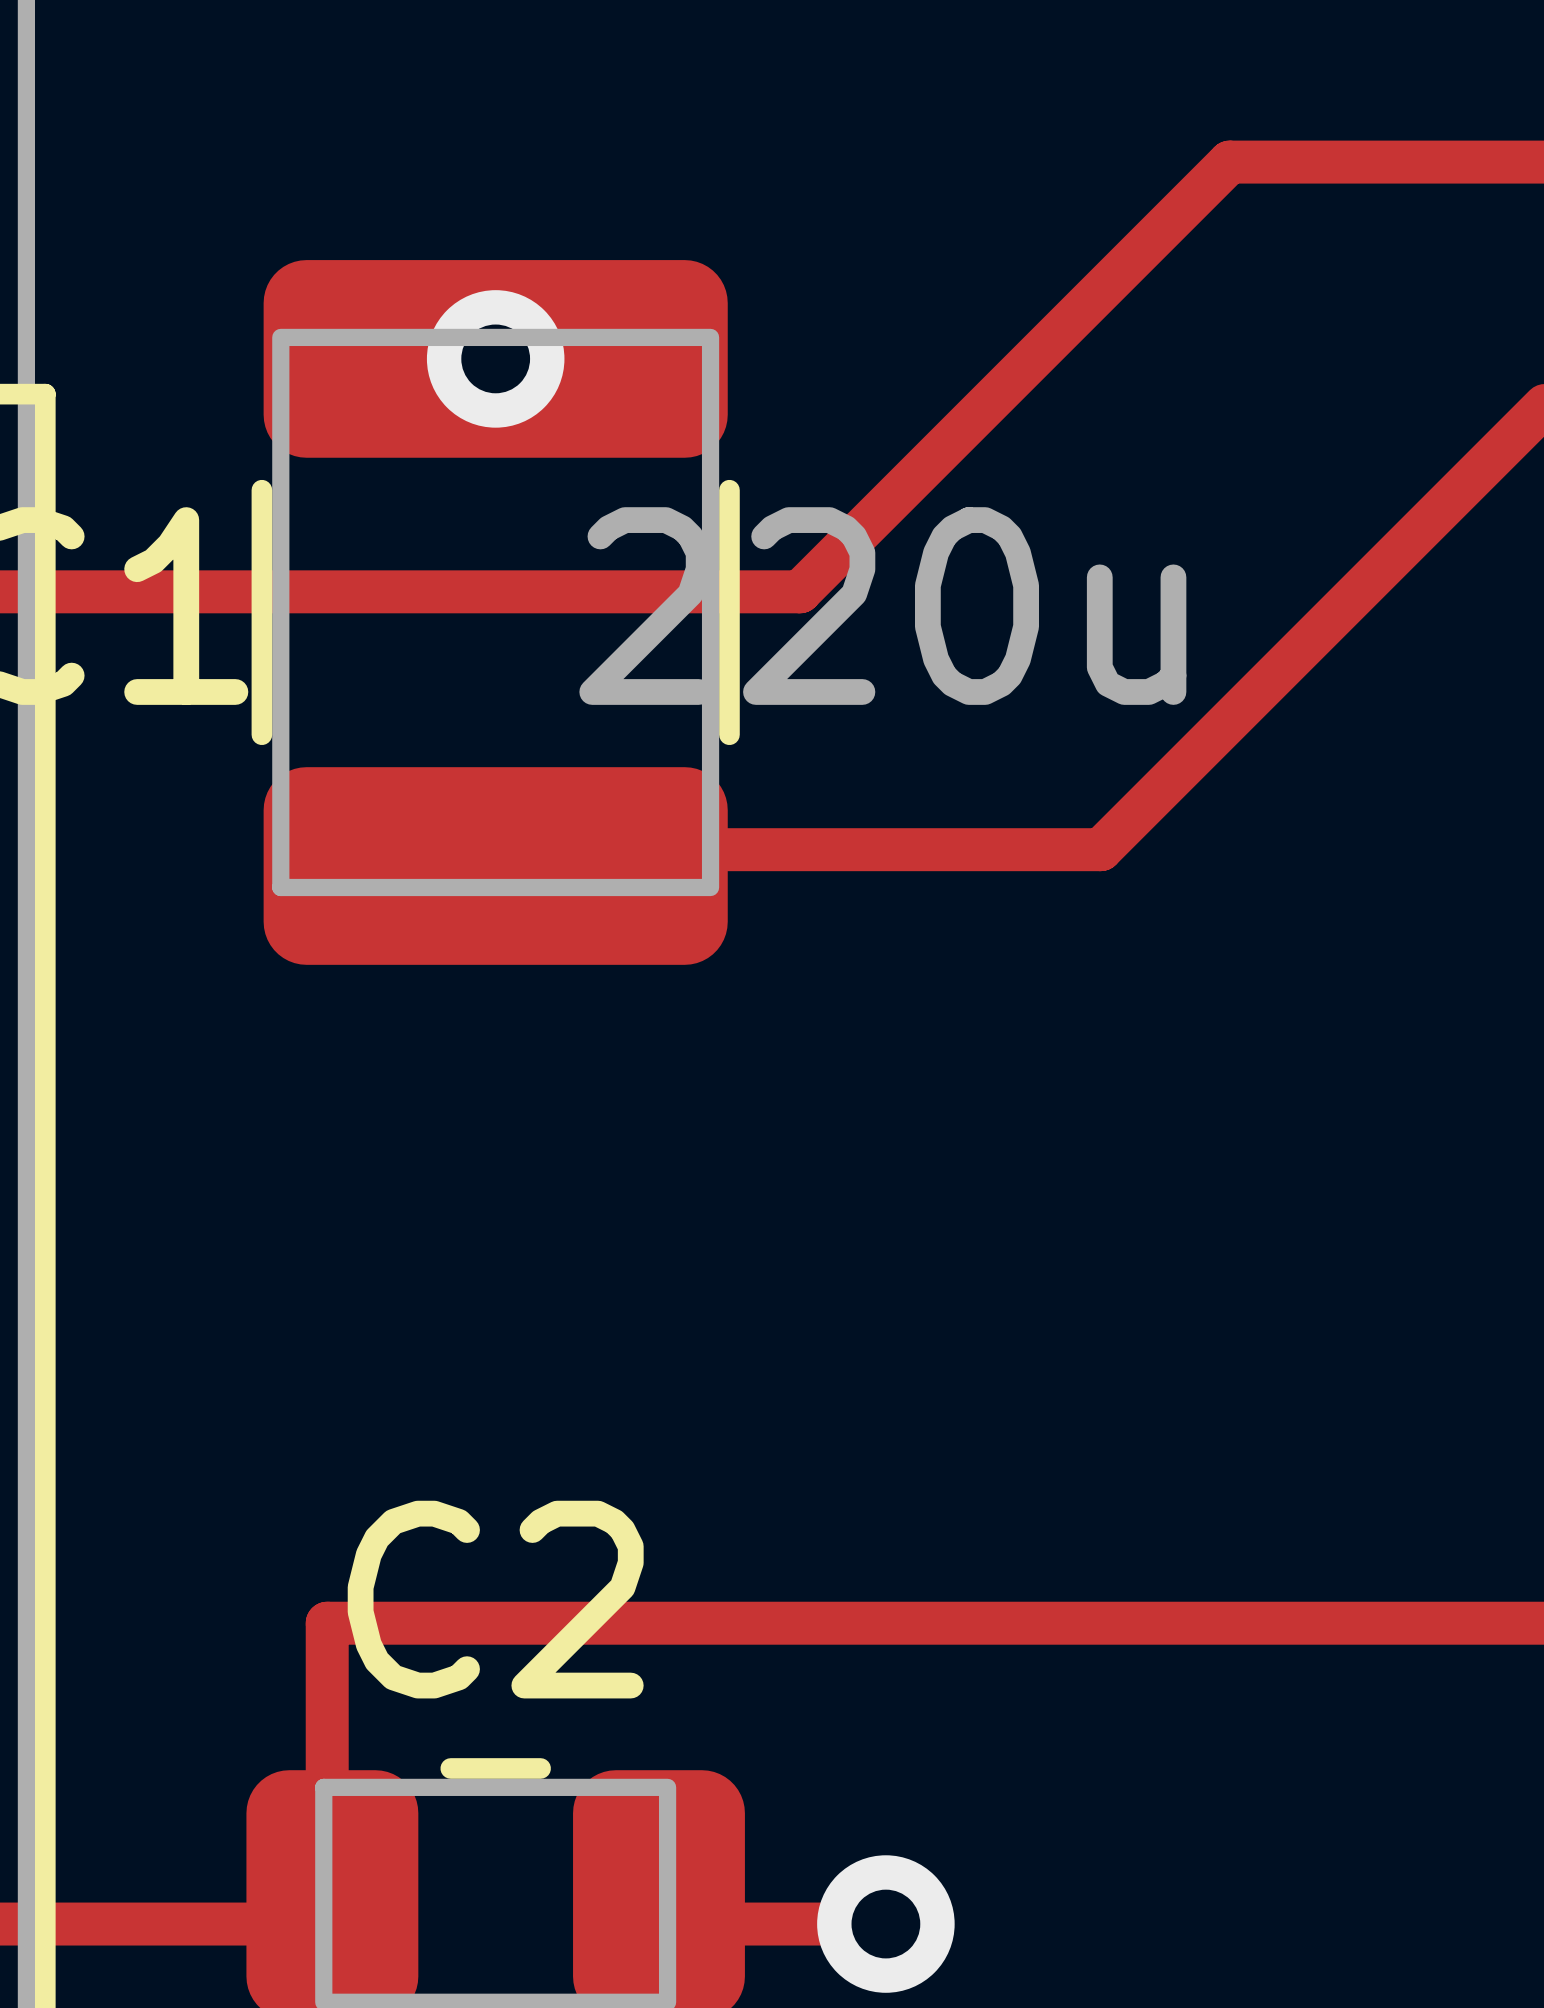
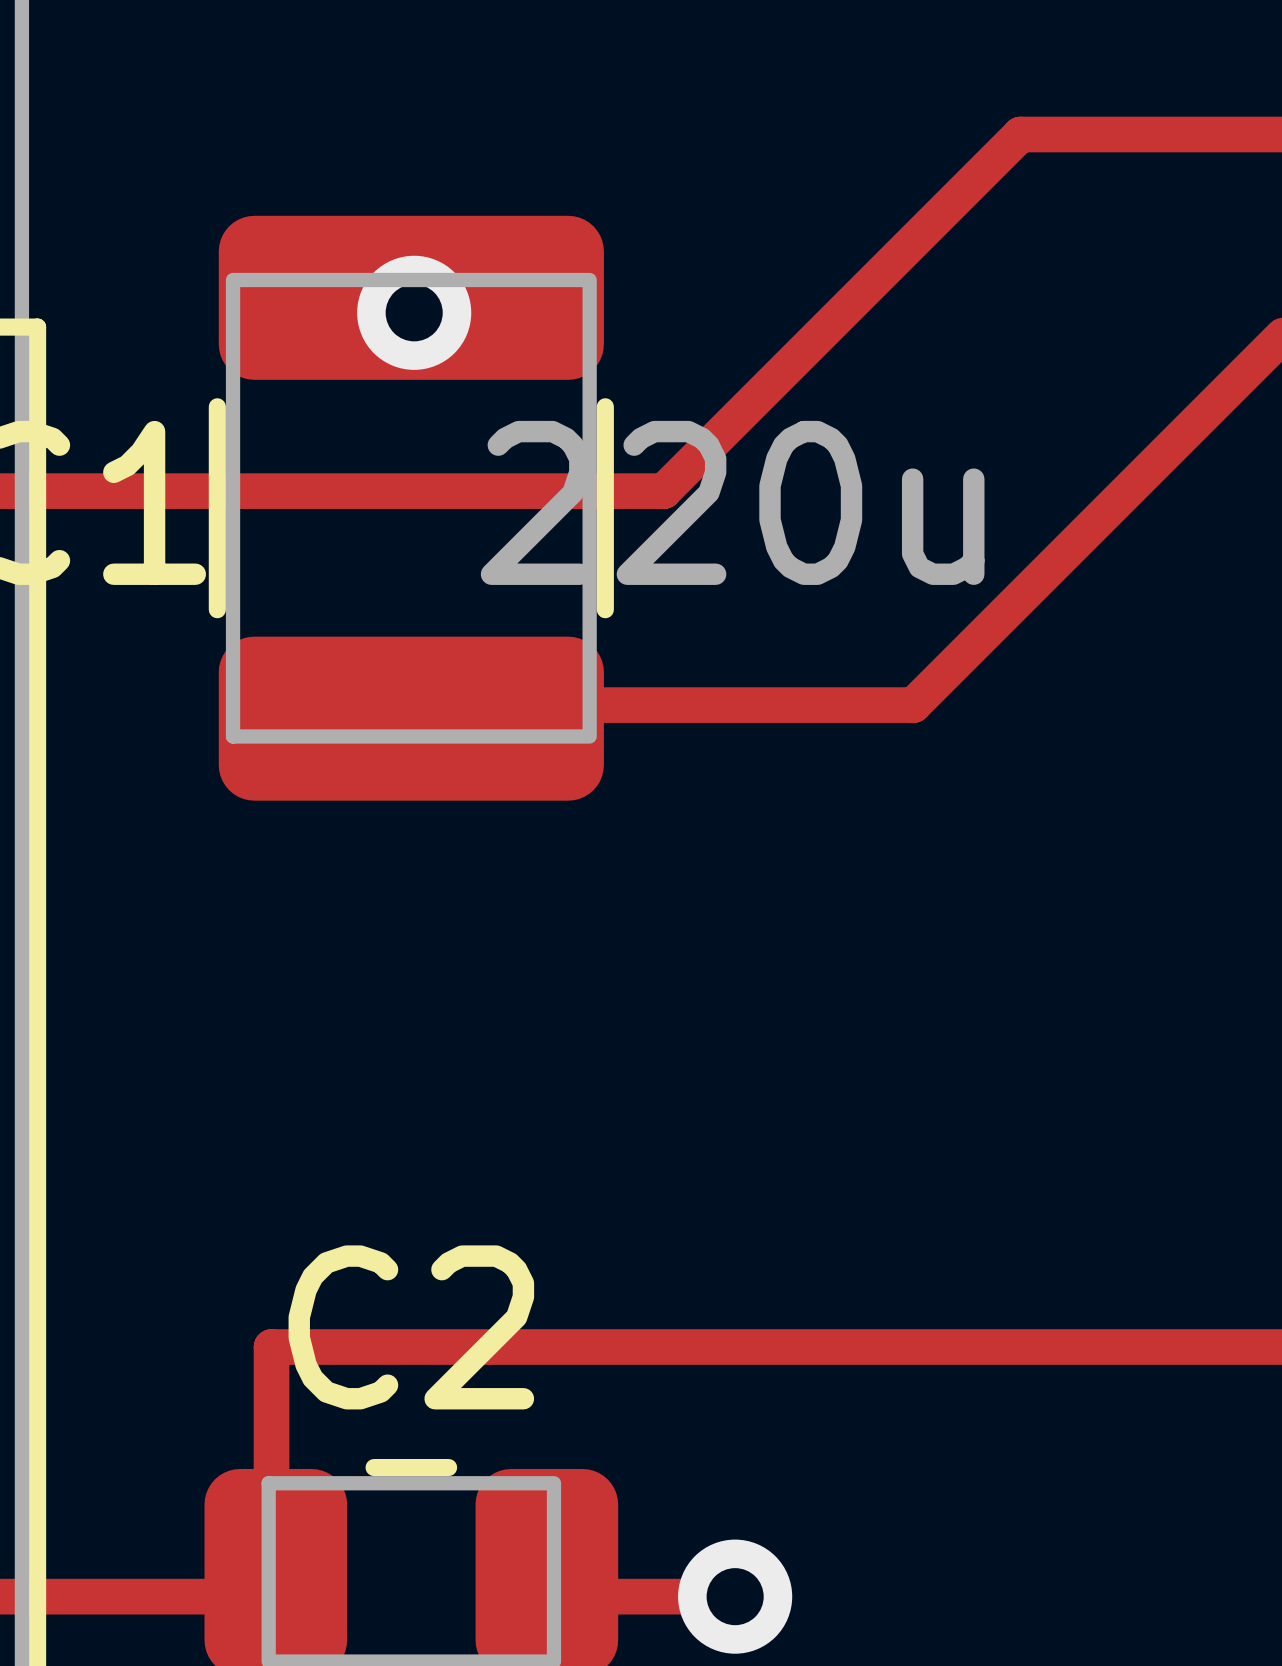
via position: (495, 358) -> (414, 312)

